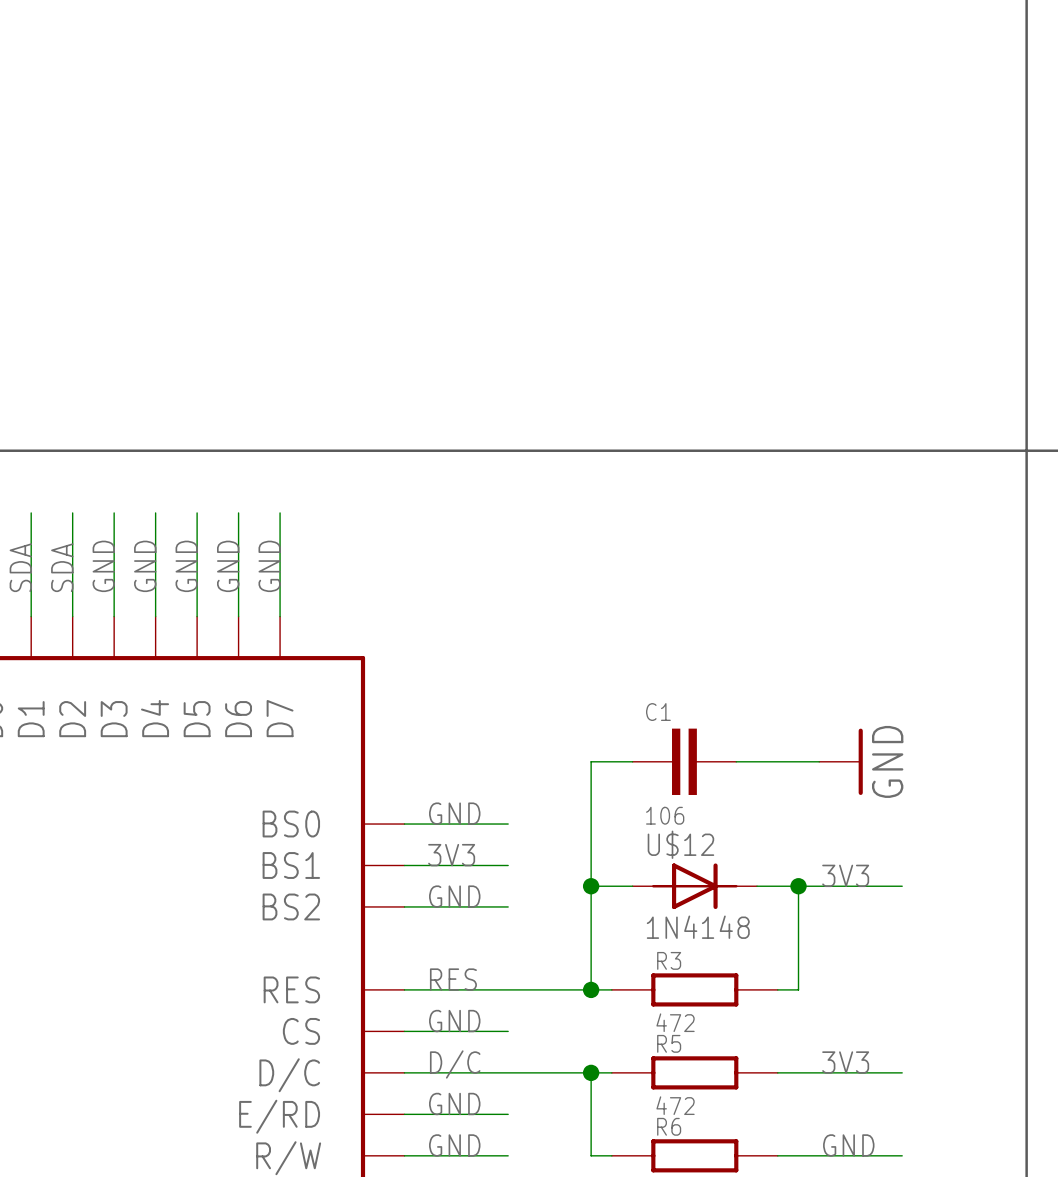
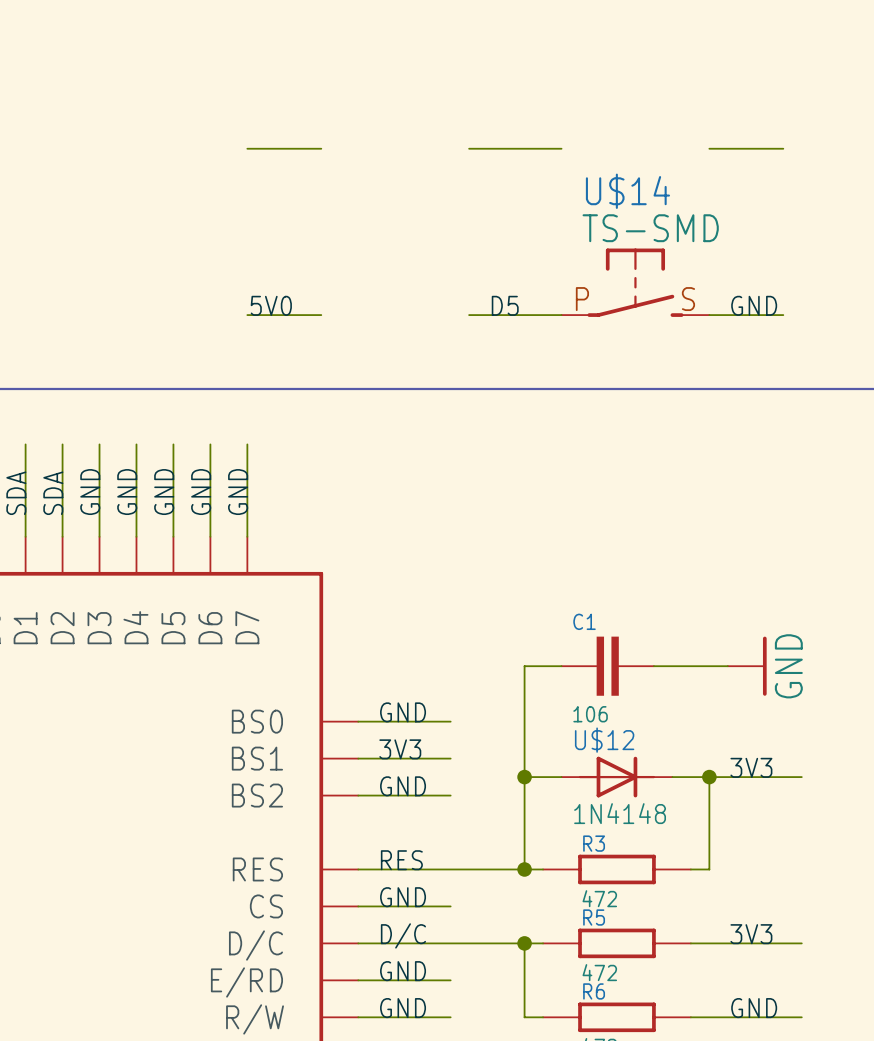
wire: none -> (247, 148) (321, 148)
wire: none -> (469, 148) (561, 148)
wire: none -> (709, 148) (783, 148)
U$14: none -> TS-SMD (635, 282)
label: none -> 5V0 (271, 305)
label: none -> D5 (505, 305)
label: none -> GND (754, 305)
wire: none -> (247, 315) (321, 315)
wire: none -> (469, 315) (561, 315)
wire: none -> (709, 315) (783, 315)

